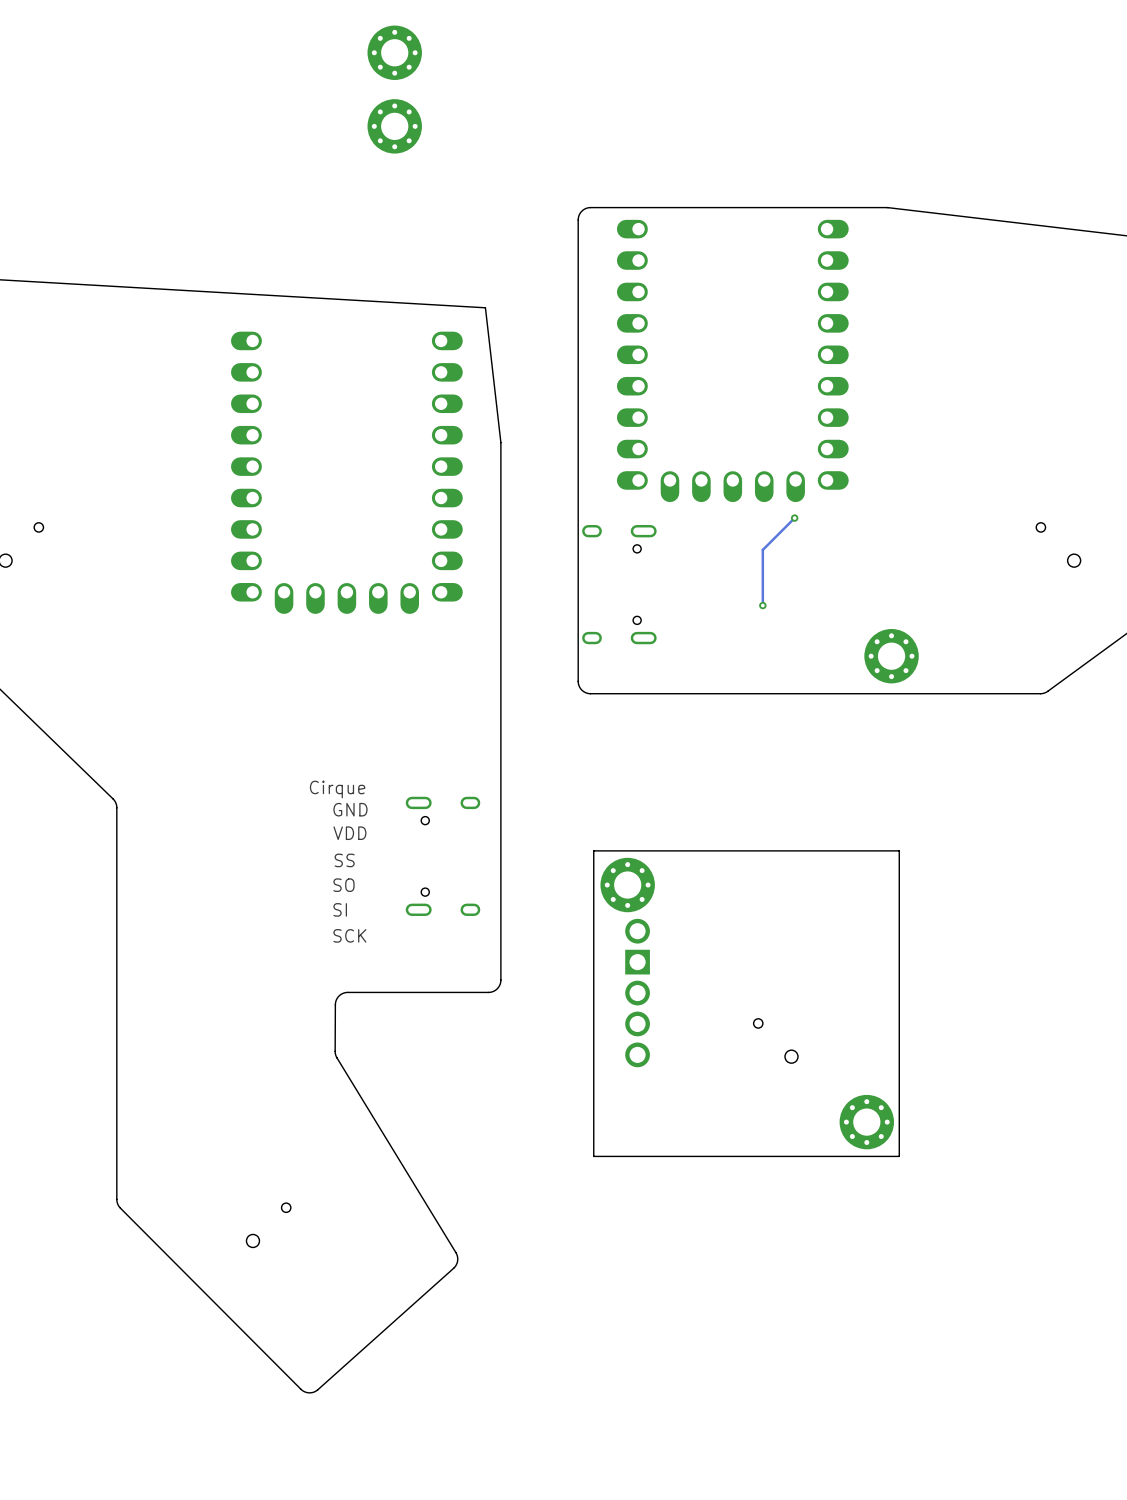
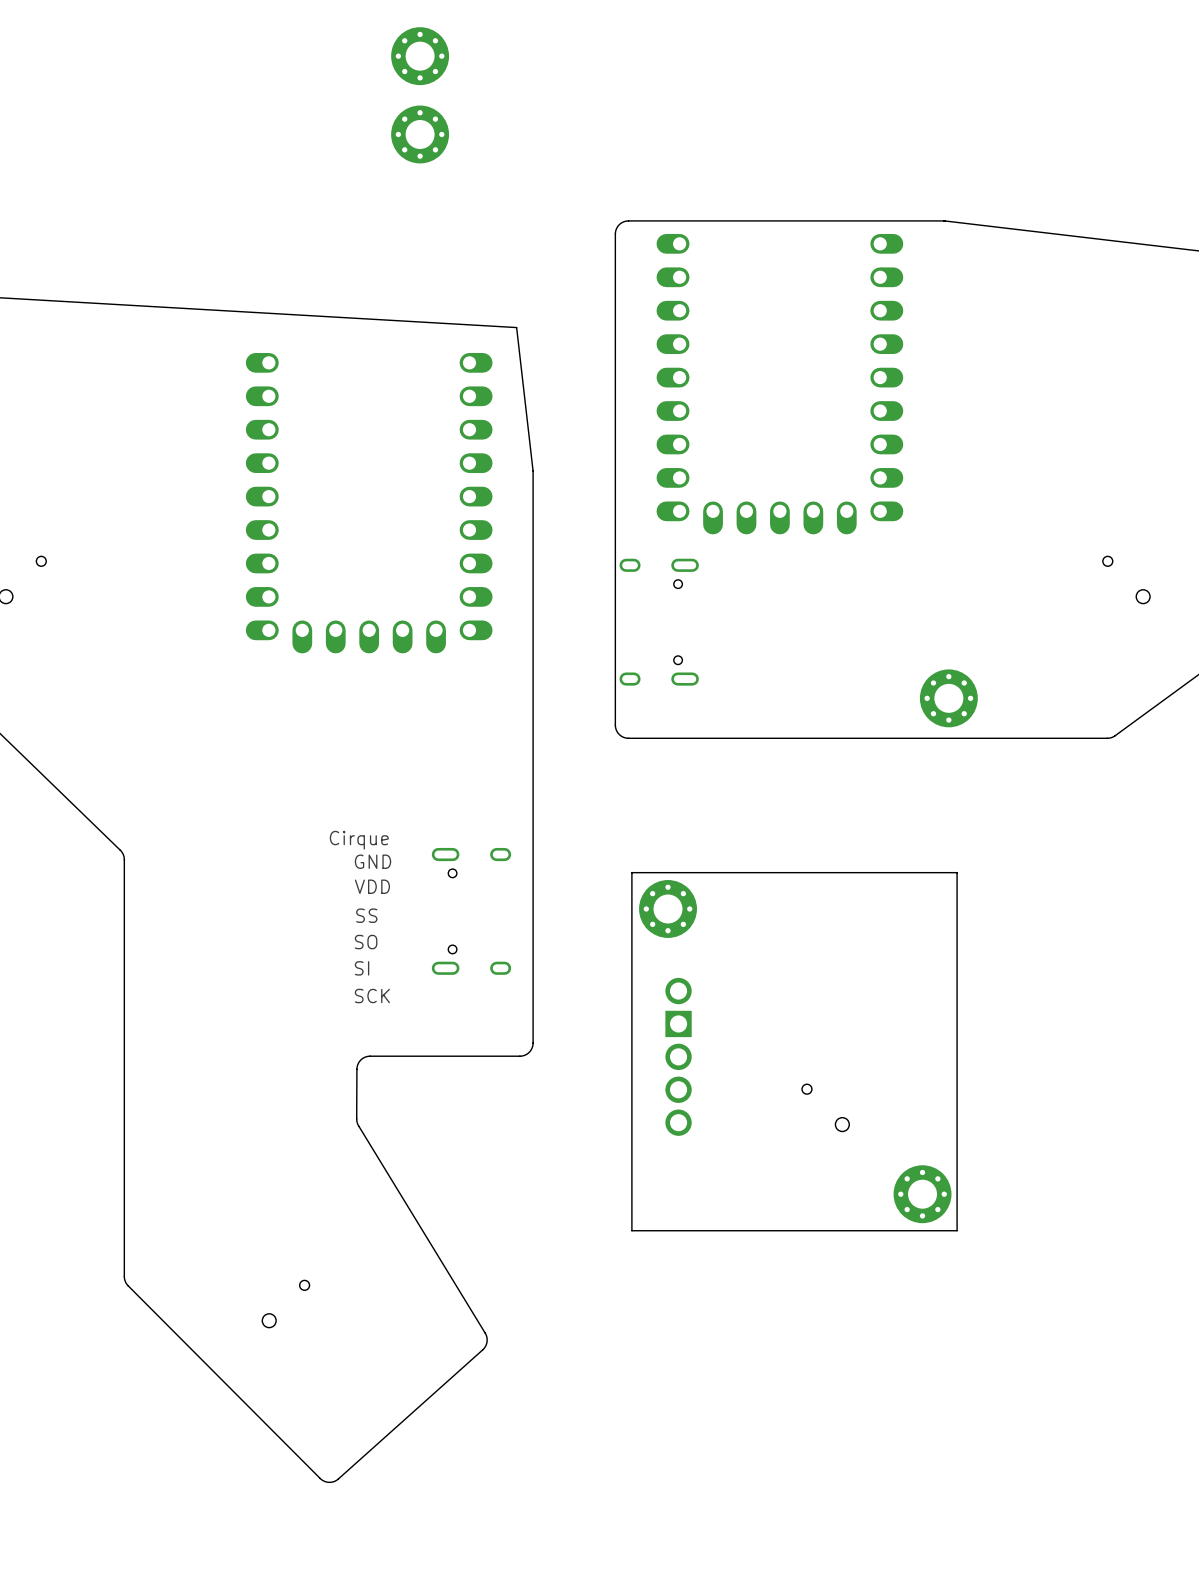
track: (794, 518) (762, 549) (762, 605) -> none
via: (794, 518) -> none
via: (762, 605) -> none
board edge: (899, 850) (593, 850) -> (957, 905) (957, 872) (631, 872) (631, 905)
part position: (627, 885) -> (668, 908)

